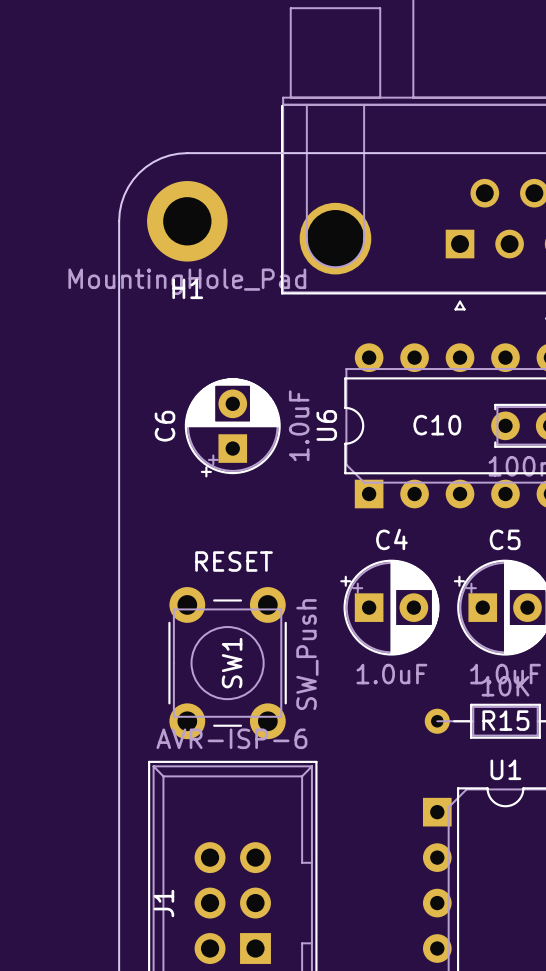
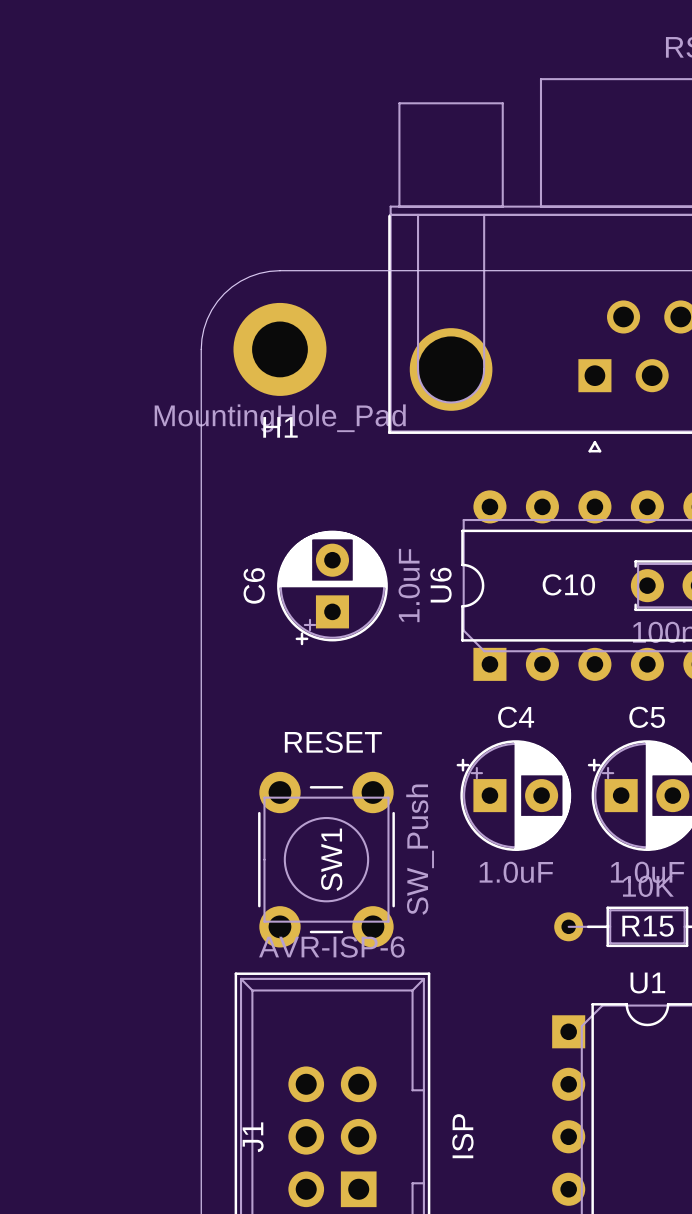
text: none -> ISP (462, 1136)

